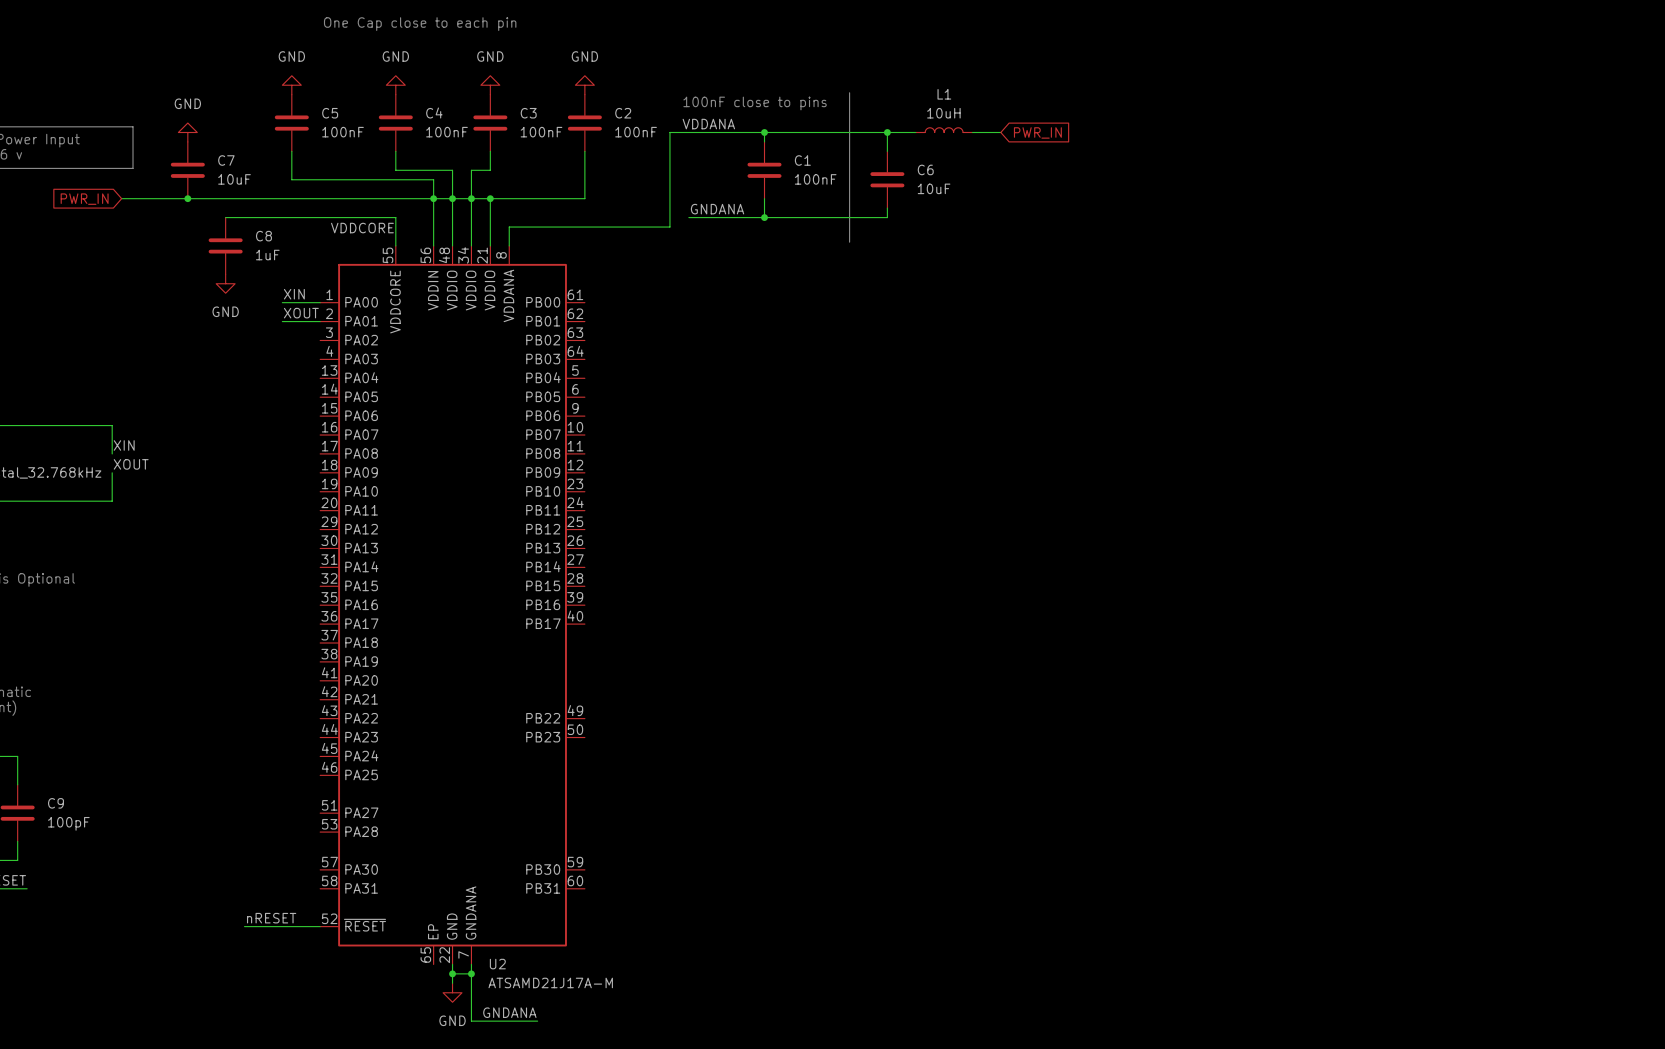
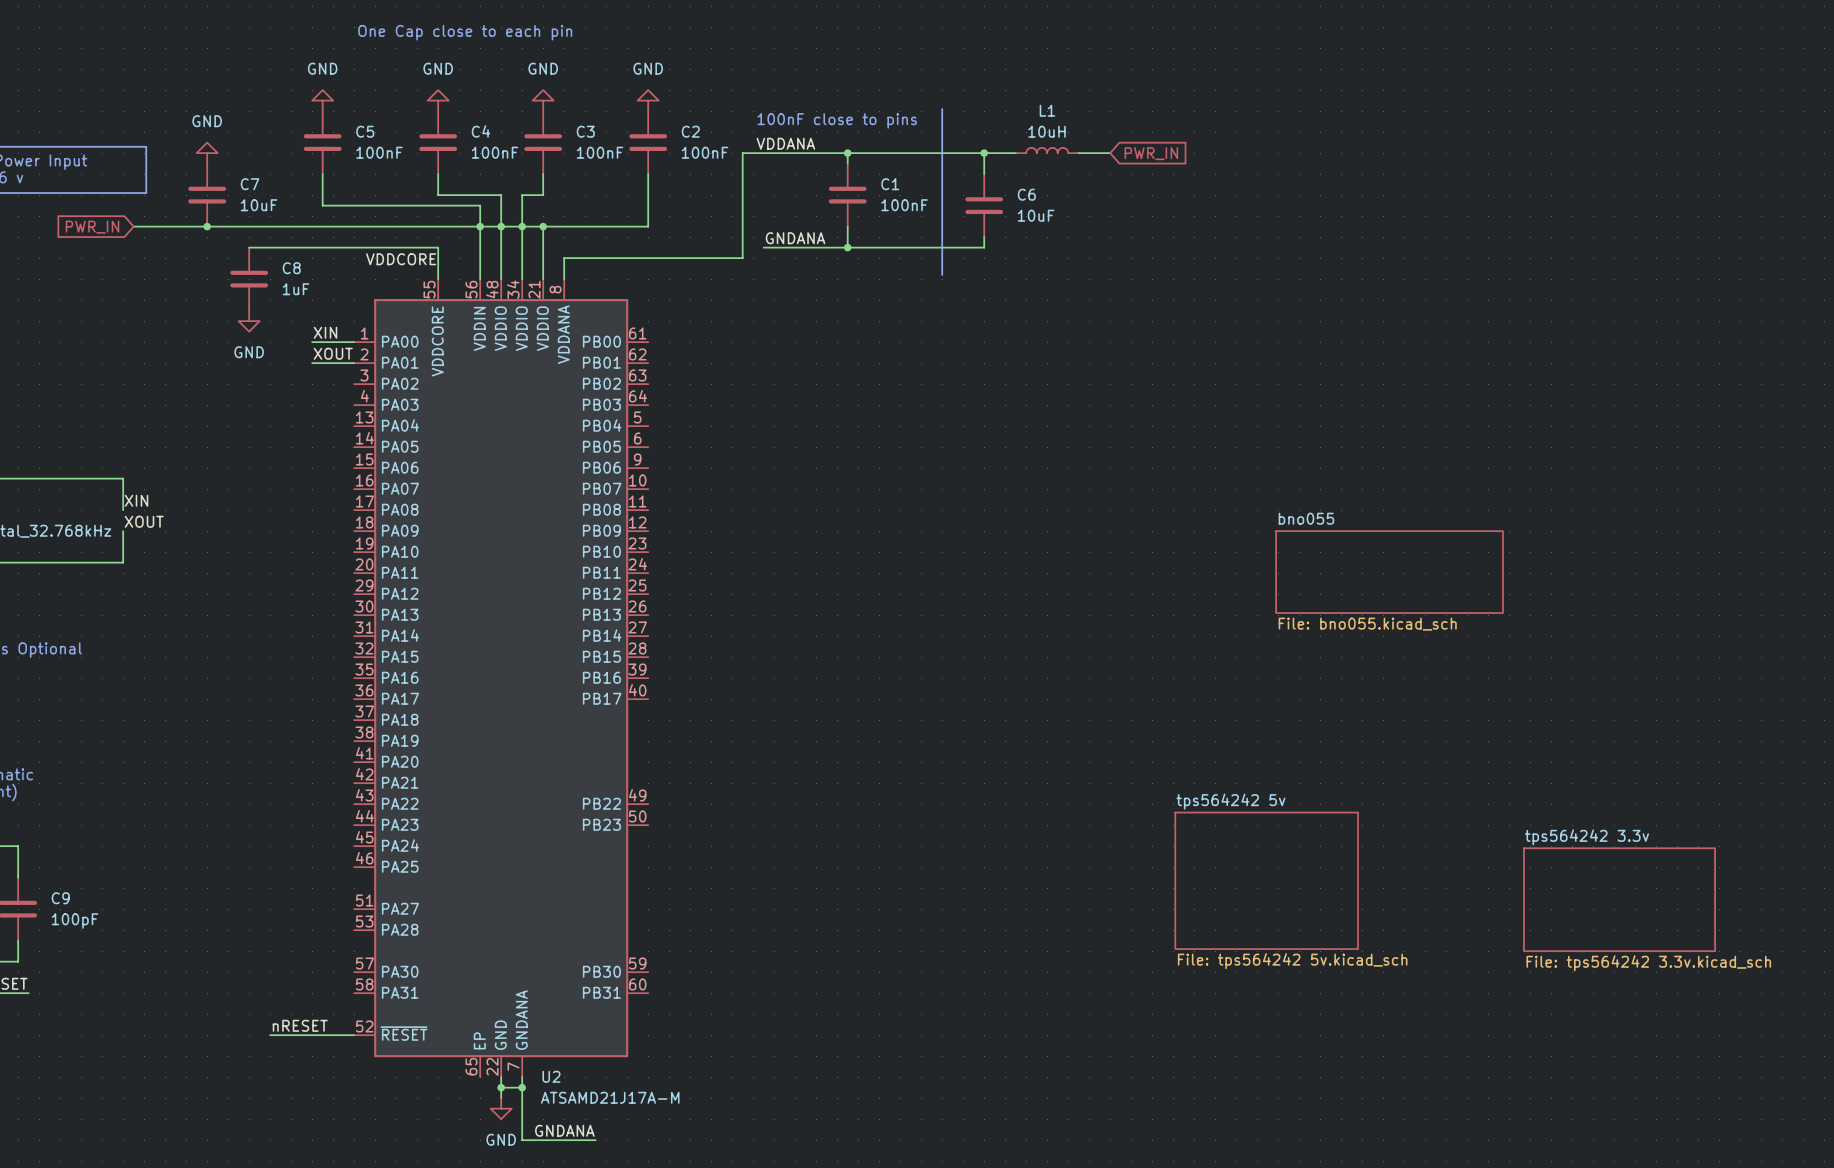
sheet bno055: none -> File: bno055.kicad_sch (1389, 572)
sheet tps564242 5v: none -> File: tps564242 5v.kicad_sch (1266, 880)
sheet tps564242 3.3v: none -> File: tps564242 3.3v.kicad_sch (1619, 899)

